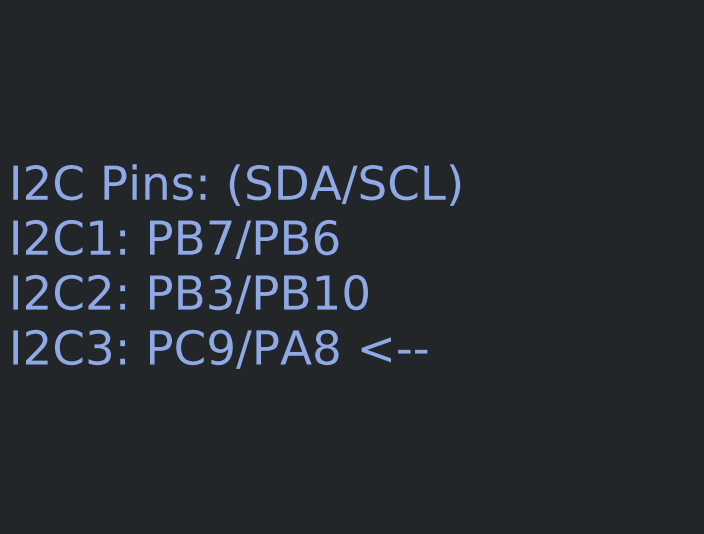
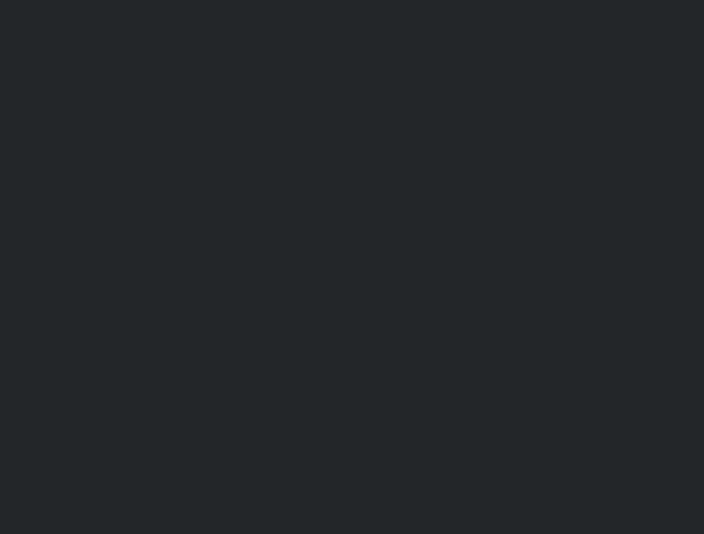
text: I2C Pins: (SDA/SCL) (236, 185) -> none
text: I2C1: PB7/PB6 (175, 239) -> none
text: I2C2: PB3/PB10 (190, 294) -> none
text: I2C3: PC9/PA8 <-- (220, 349) -> none

